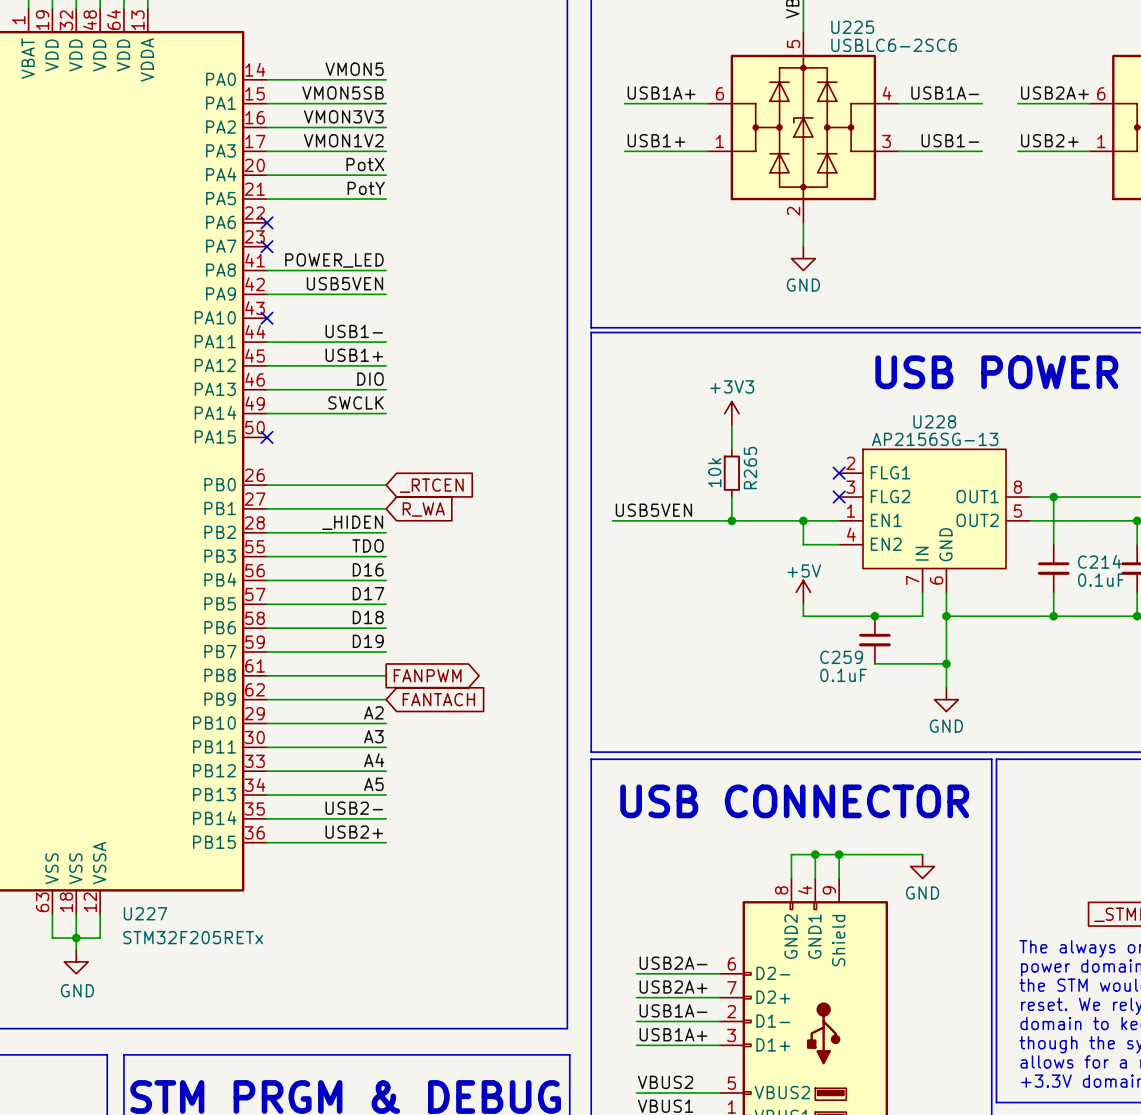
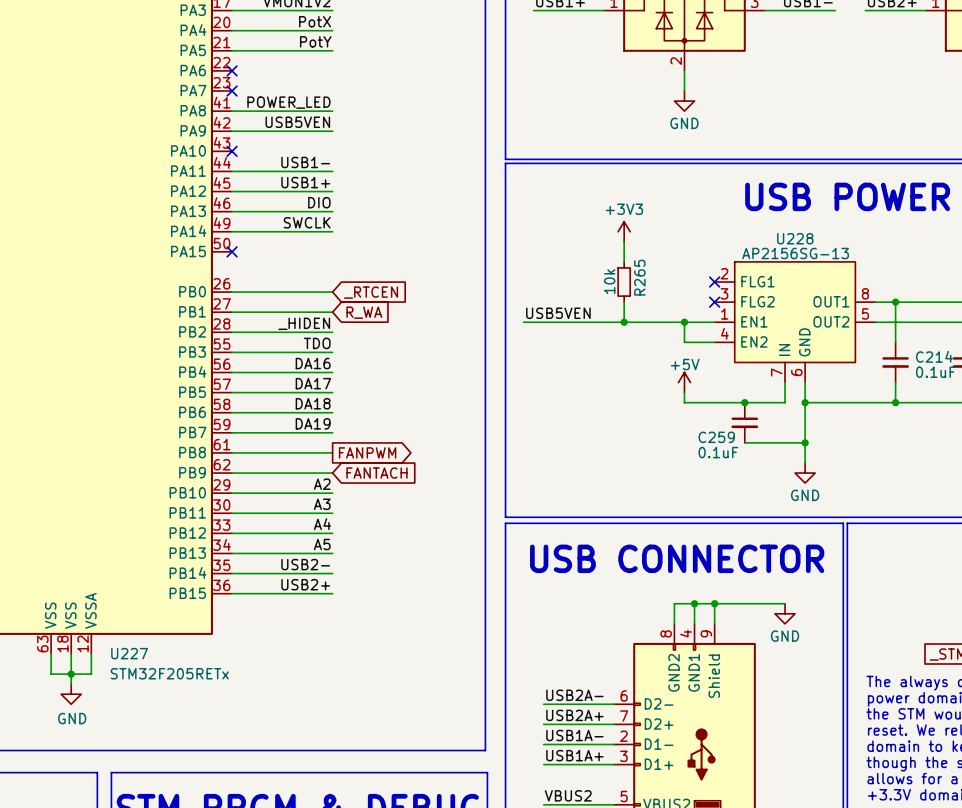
label: D16 (368, 569) -> DA16 (313, 363)
label: D17 (368, 593) -> DA17 (313, 383)
label: D18 (368, 617) -> DA18 (313, 403)
label: D19 (368, 641) -> DA19 (313, 423)

